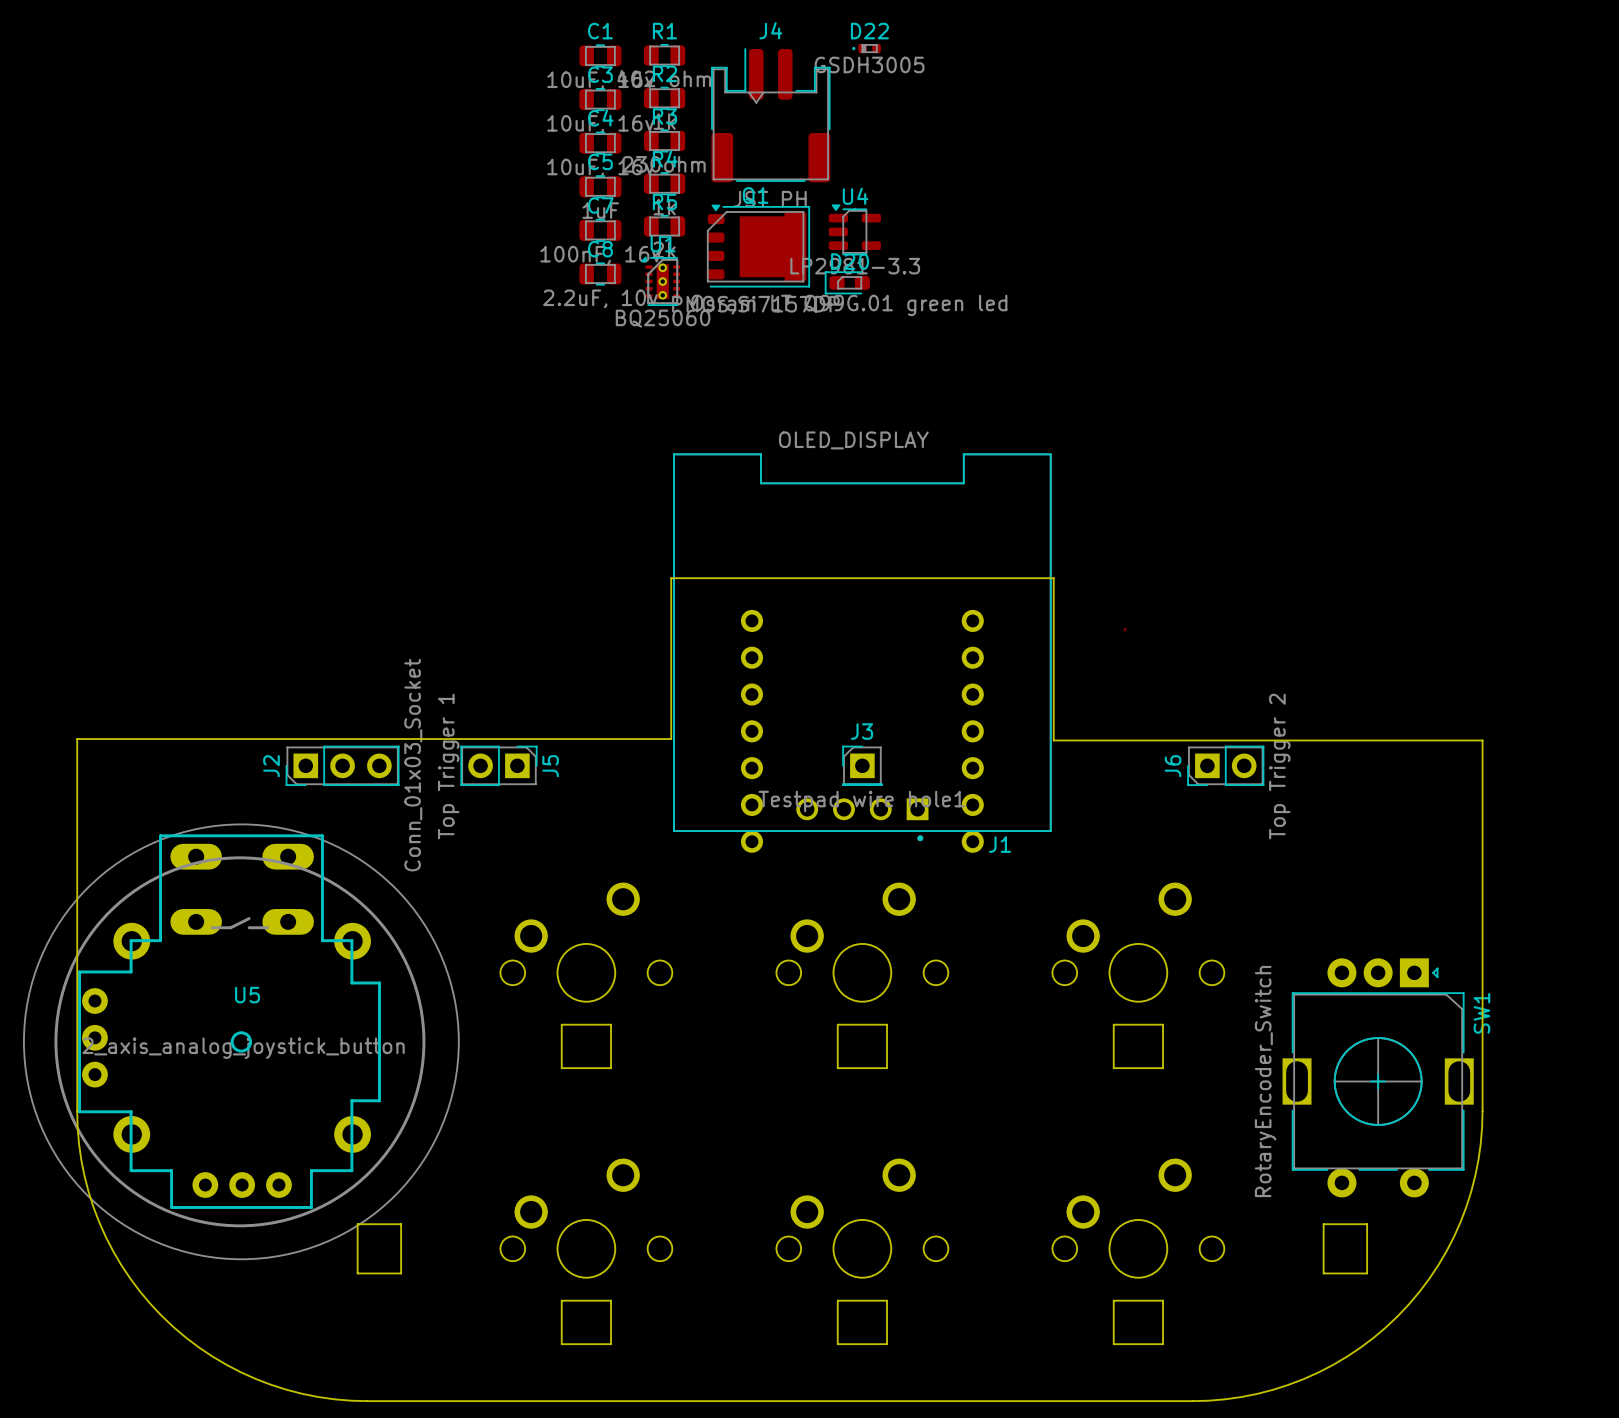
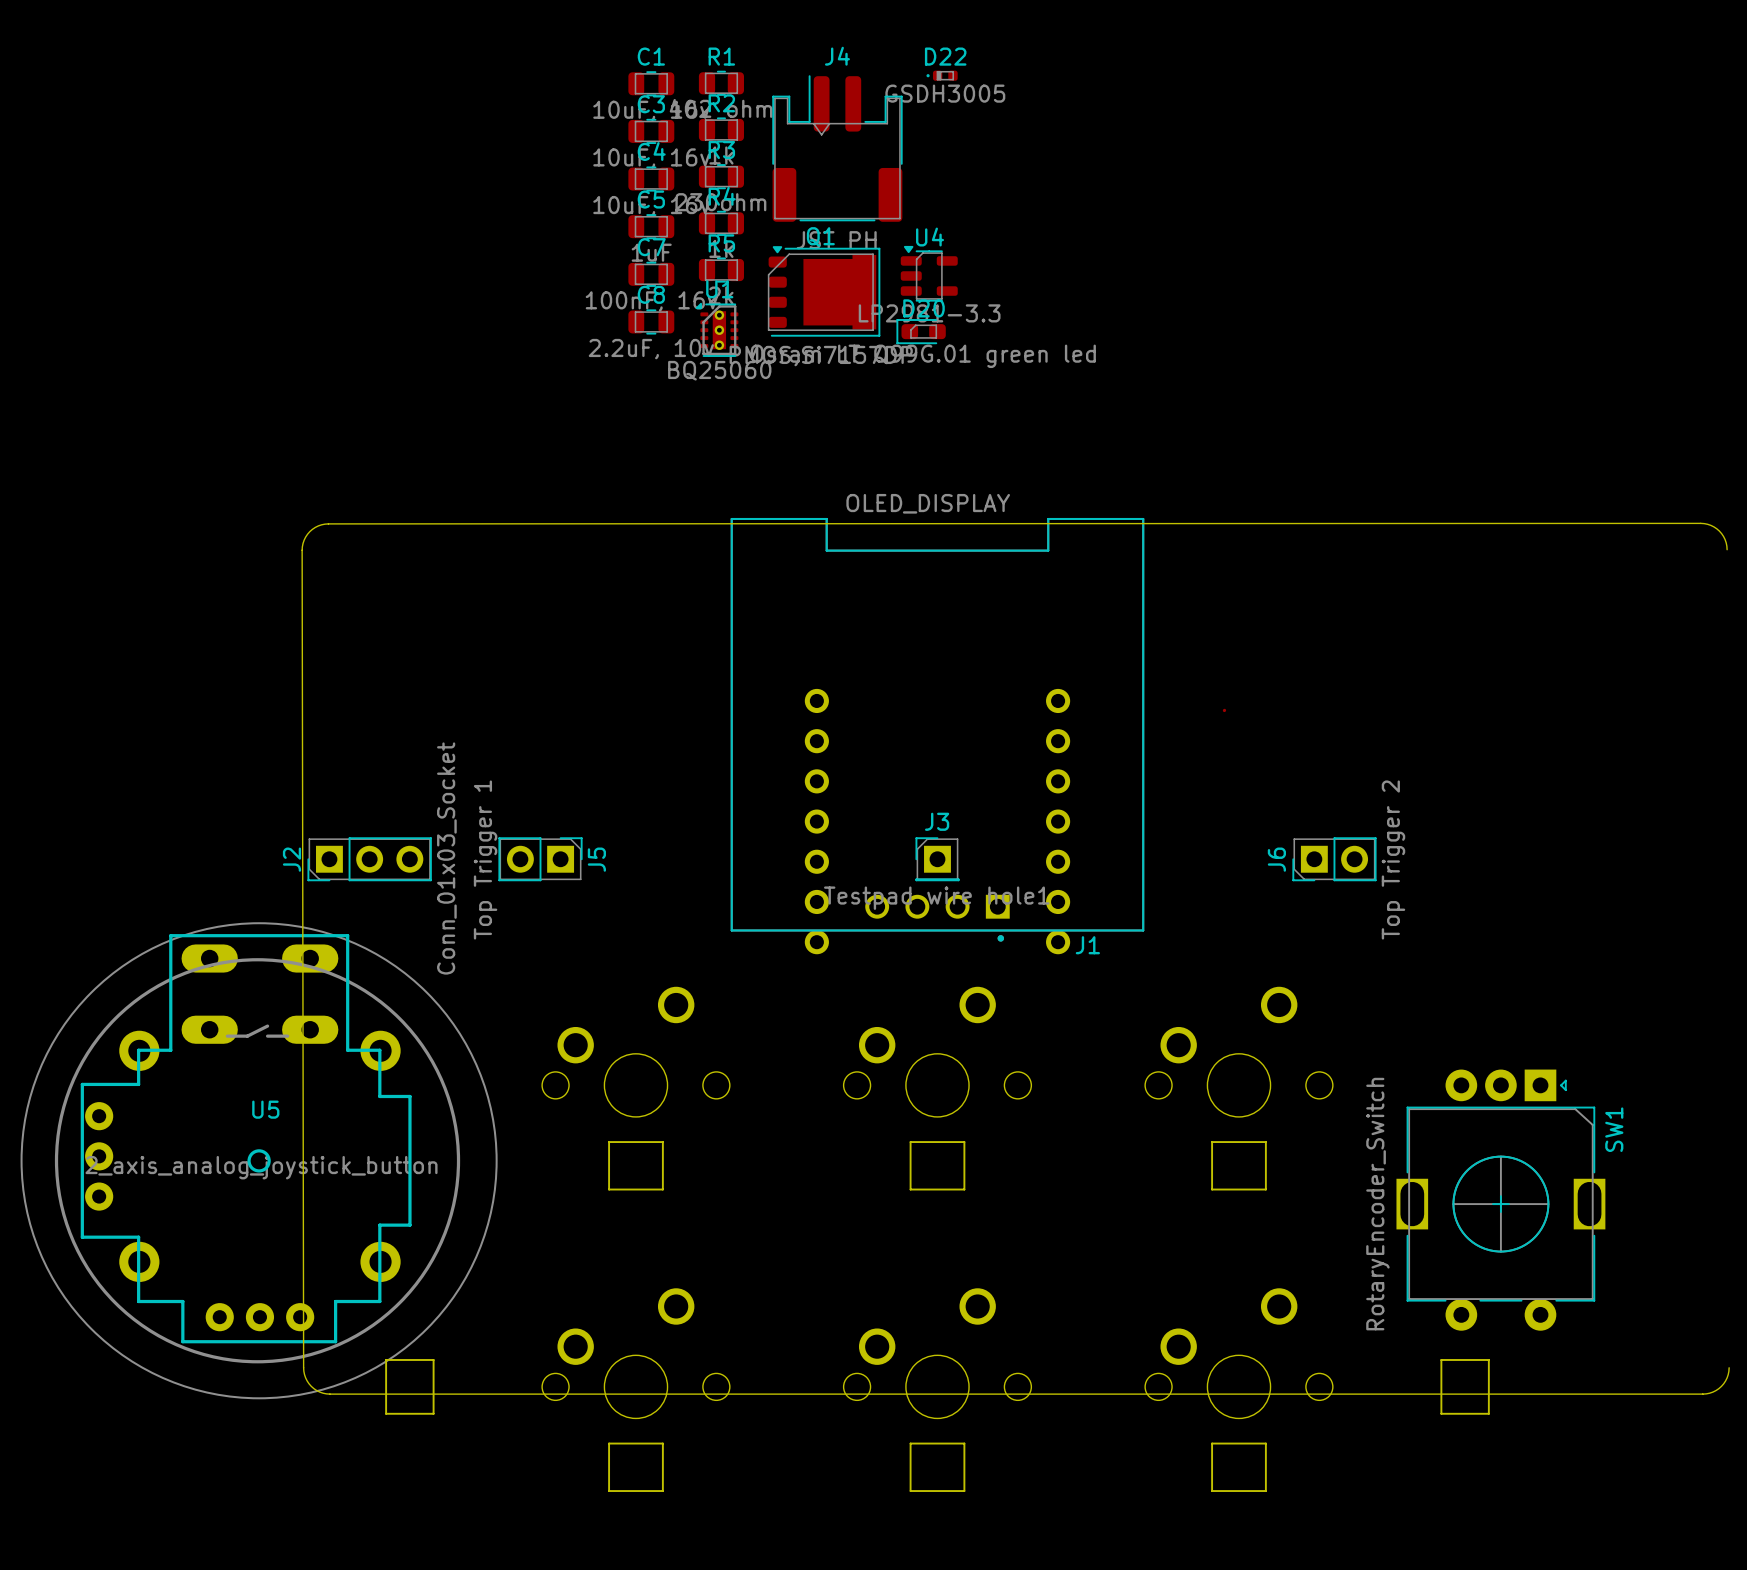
board edge: none -> (1727, 549) (1725, 539) (1719, 531) (1710, 525) (1700, 523) (328, 523) (315, 527) (305, 537) (302, 550) (303, 1367) (305, 1377) (311, 1386) (319, 1392) (329, 1394) (1702, 1394) (1712, 1392) (1721, 1386) (1727, 1377) (1729, 1367)
board edge: (671, 578) (1053, 578) (1053, 740) (1482, 740) (1482, 1111) (1478, 1159) (1471, 1191) (1453, 1237) (1429, 1279) (1397, 1316) (1360, 1347) (1332, 1364) (1303, 1379) (1257, 1393) (1225, 1399) (1192, 1401) (350, 1400) (302, 1393) (256, 1379) (212, 1356) (186, 1337) (162, 1316) (130, 1279) (113, 1251) (93, 1207) (81, 1159) (77, 1111) (77, 739) (671, 739) (671, 578) -> none

